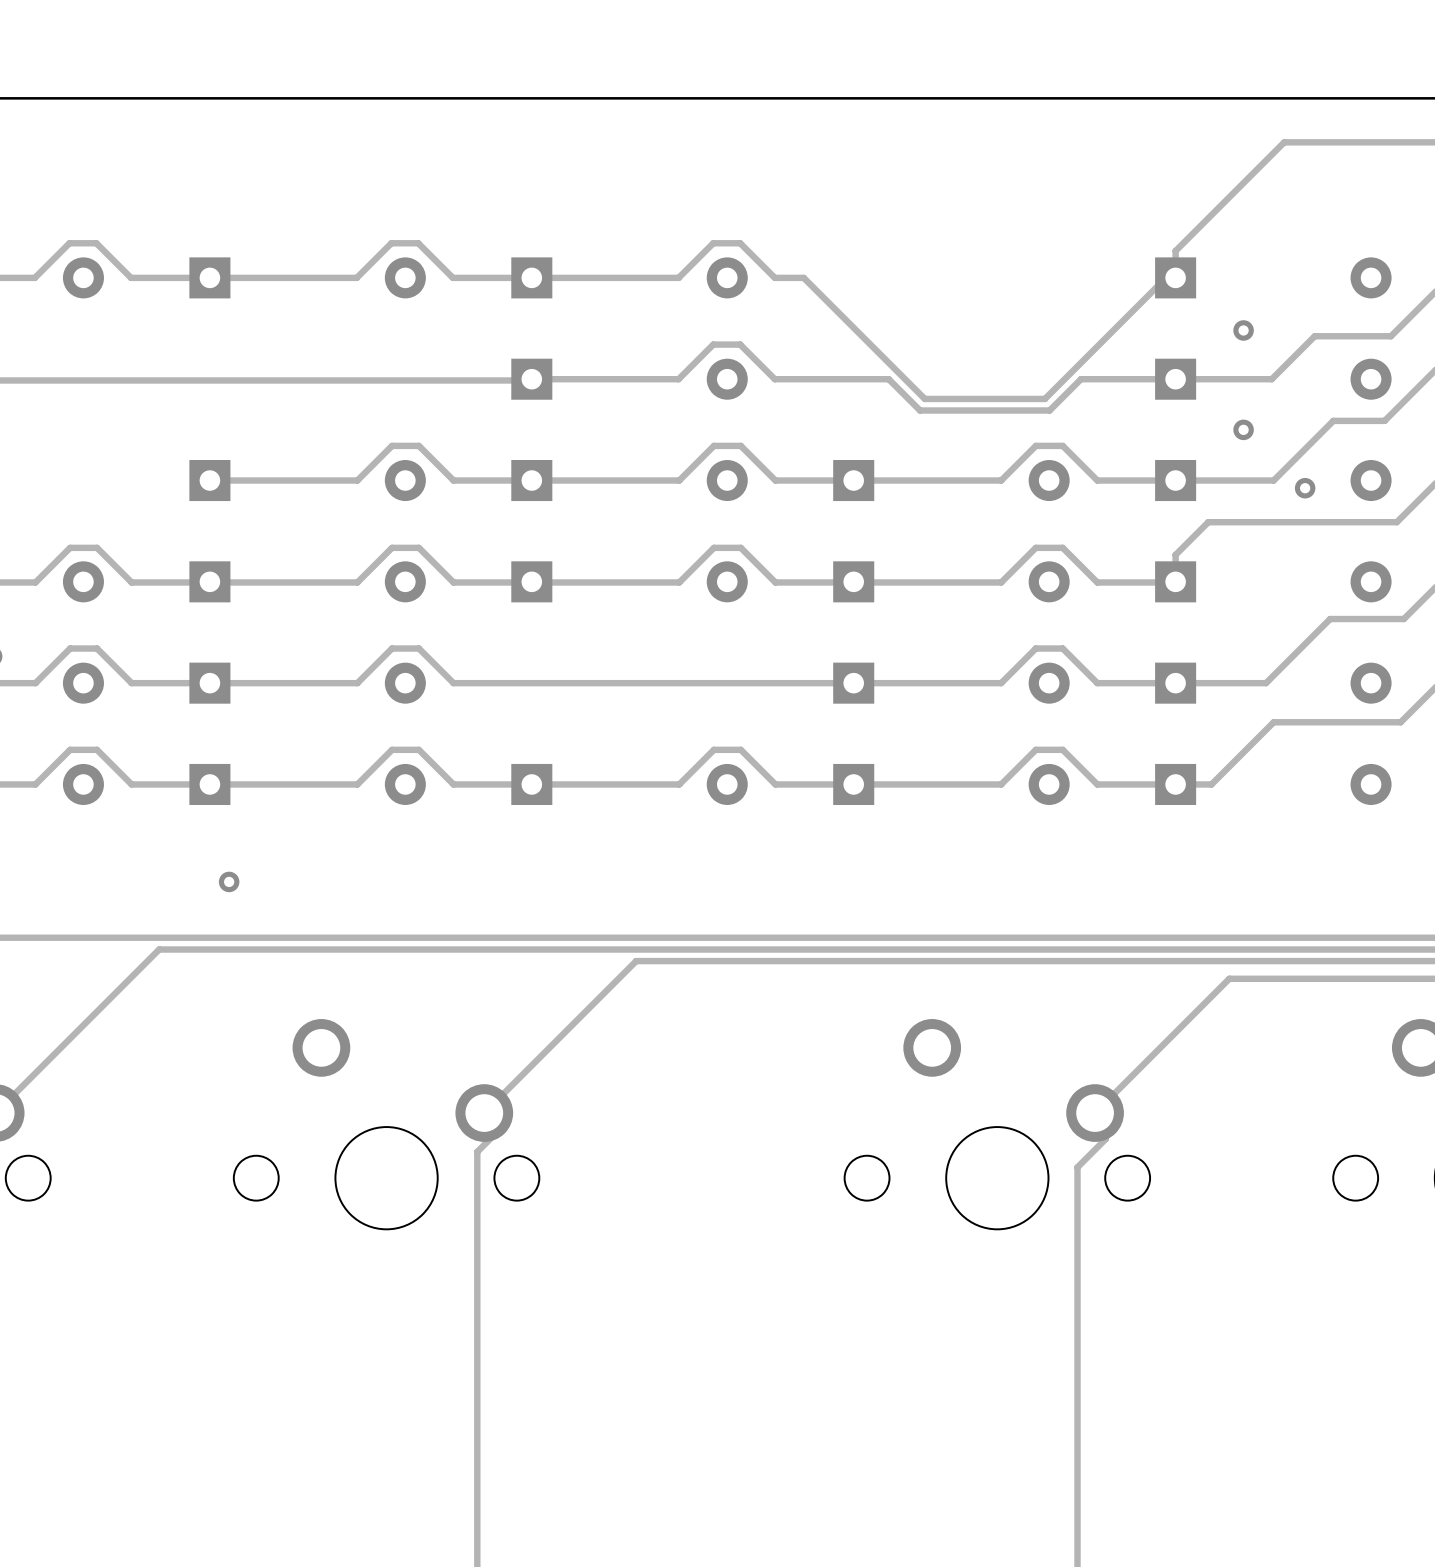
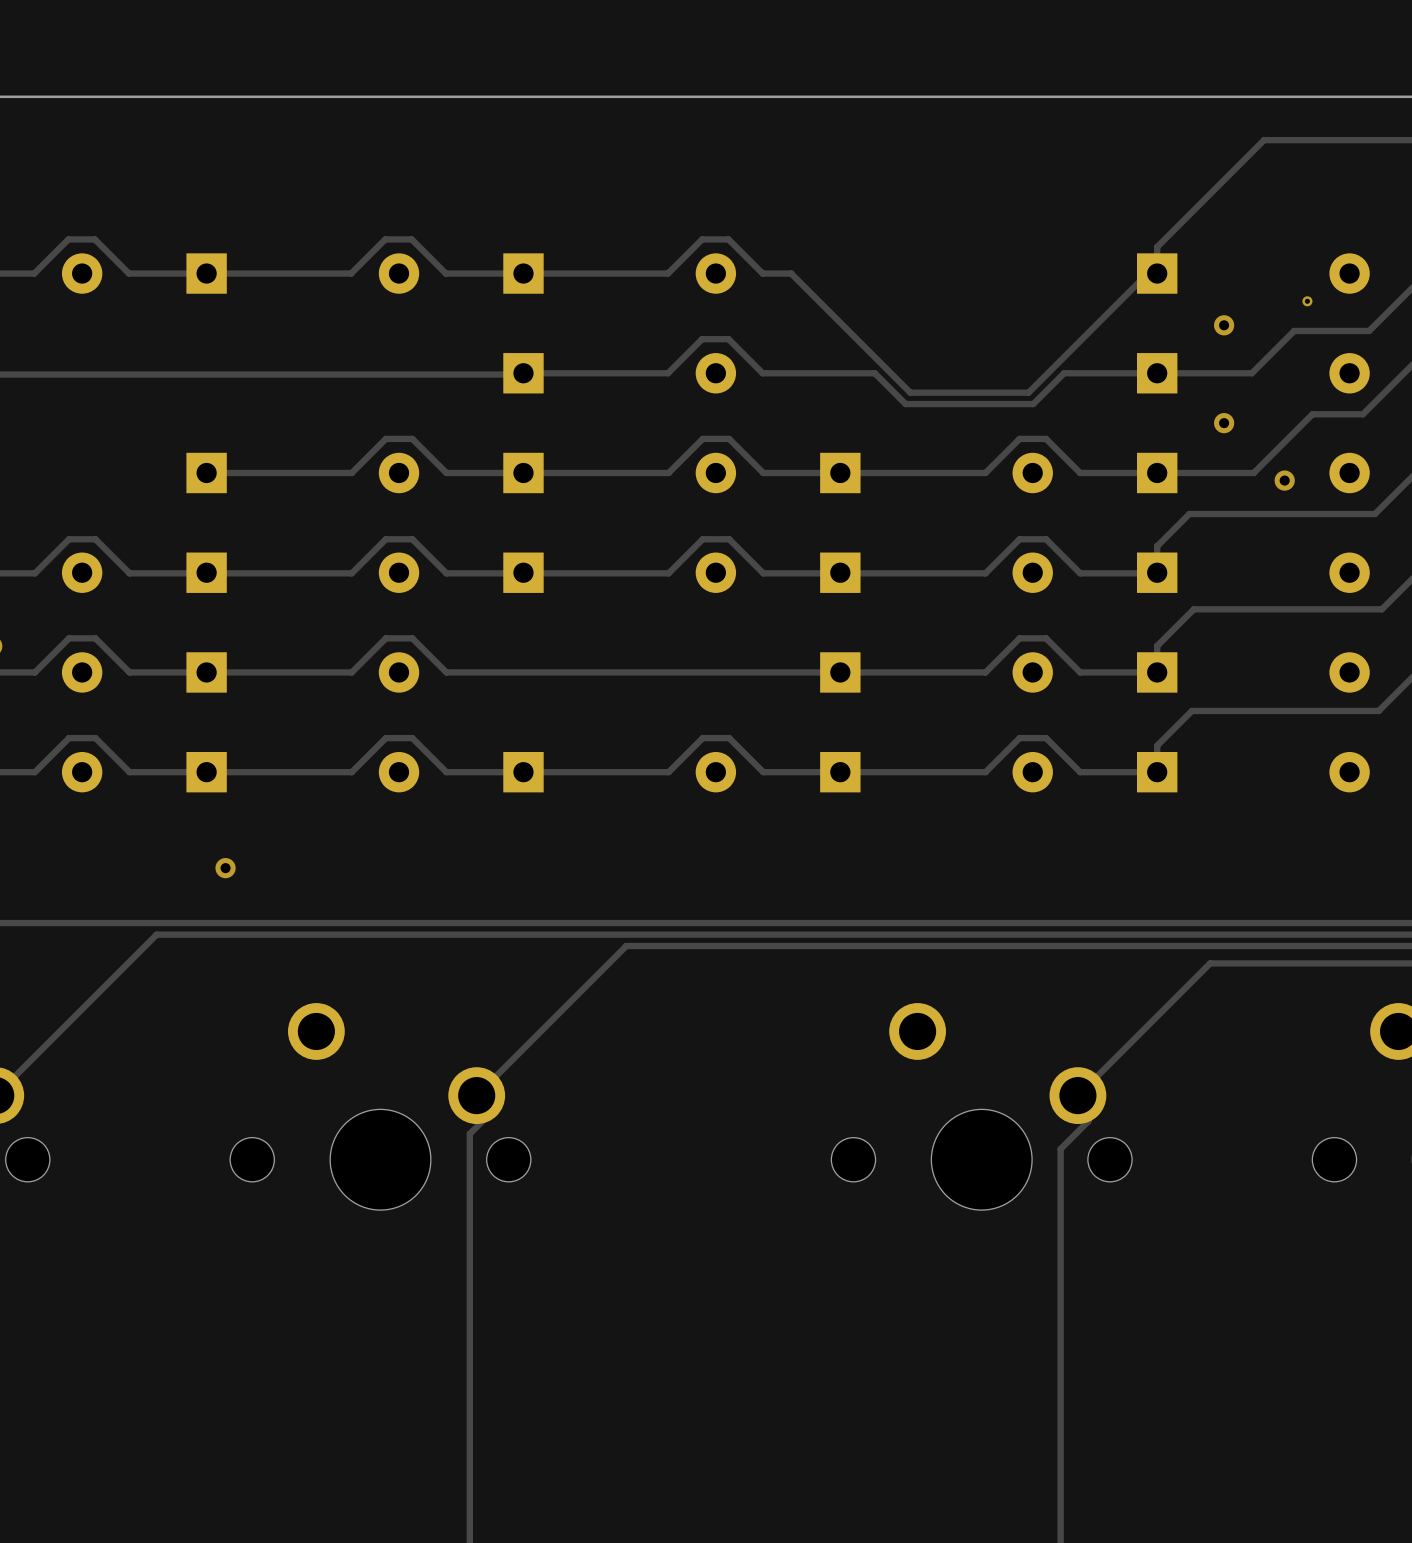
via: none -> (1307, 301)
track: (1330, 619) (1266, 683) (1175, 683) -> (1309, 609) (1193, 609) (1157, 645) (1157, 672)
track: (1273, 722) (1211, 784) (1175, 784) -> (1253, 710) (1191, 710) (1157, 745) (1157, 772)

